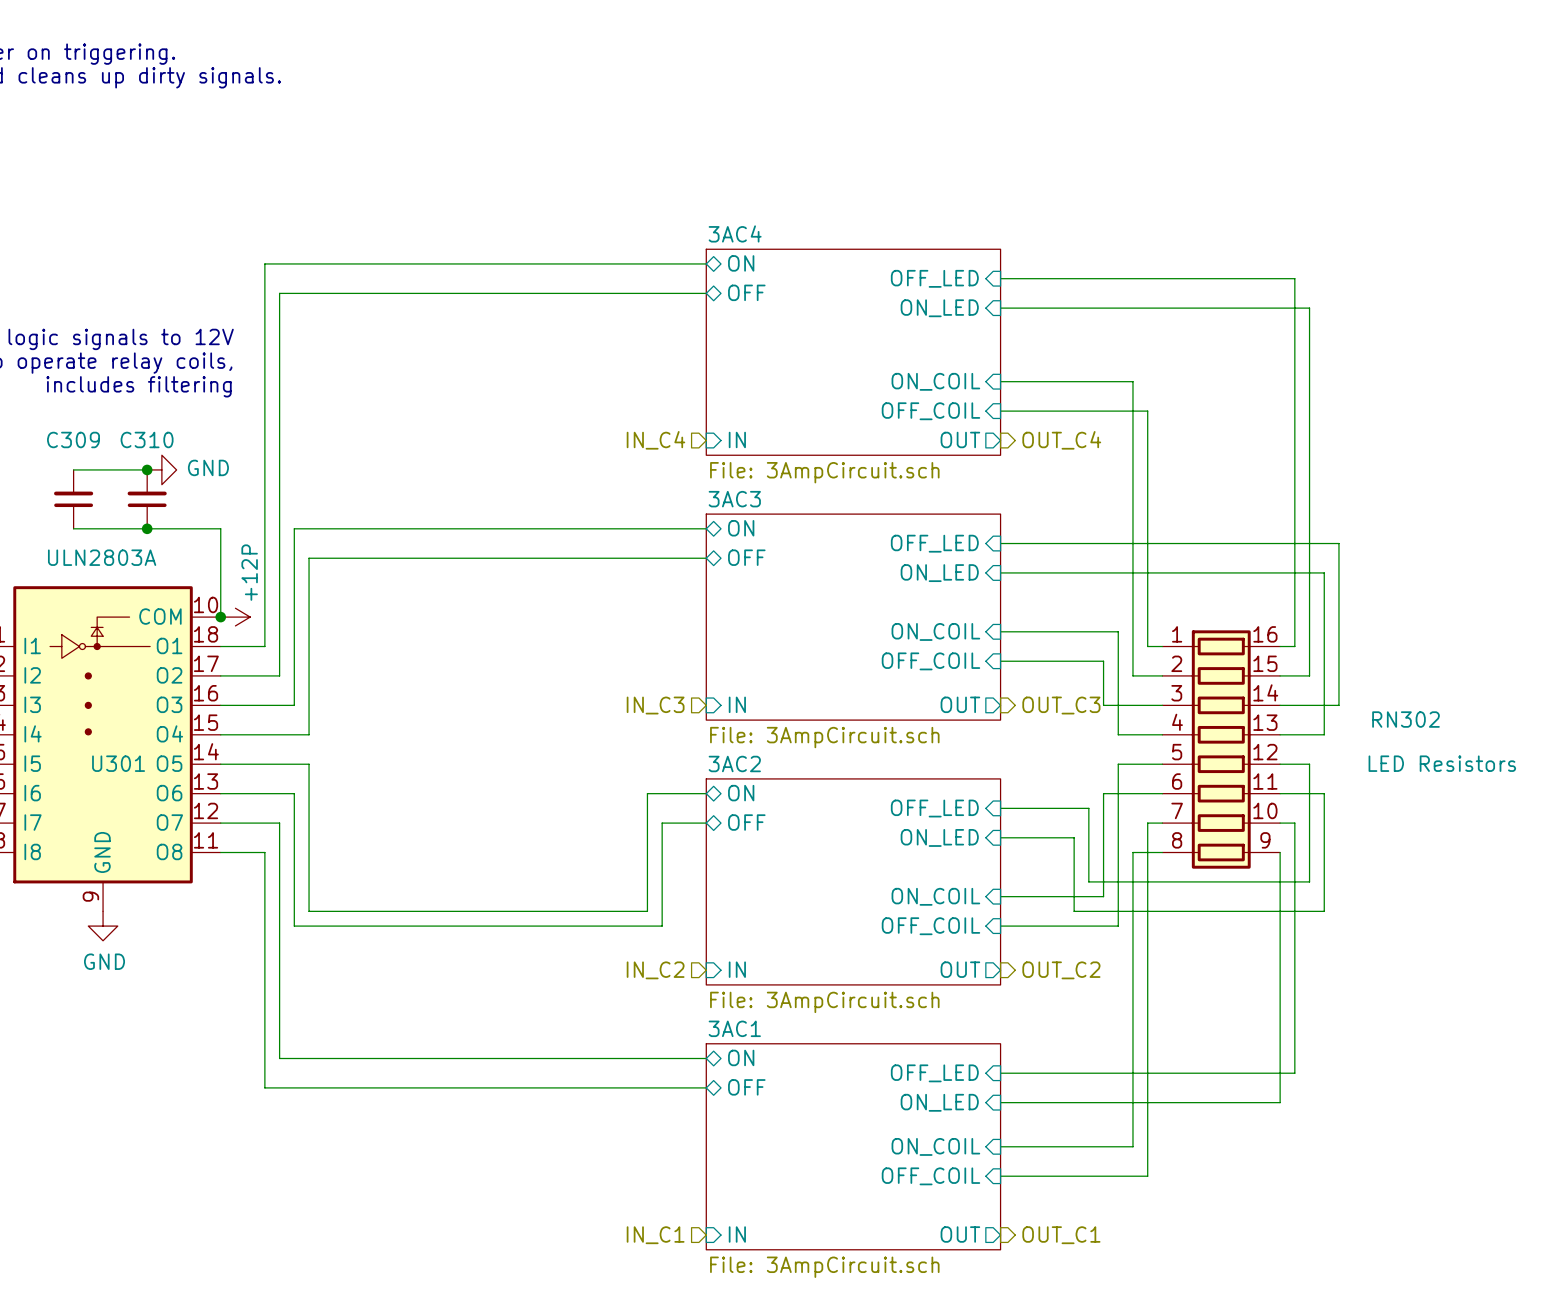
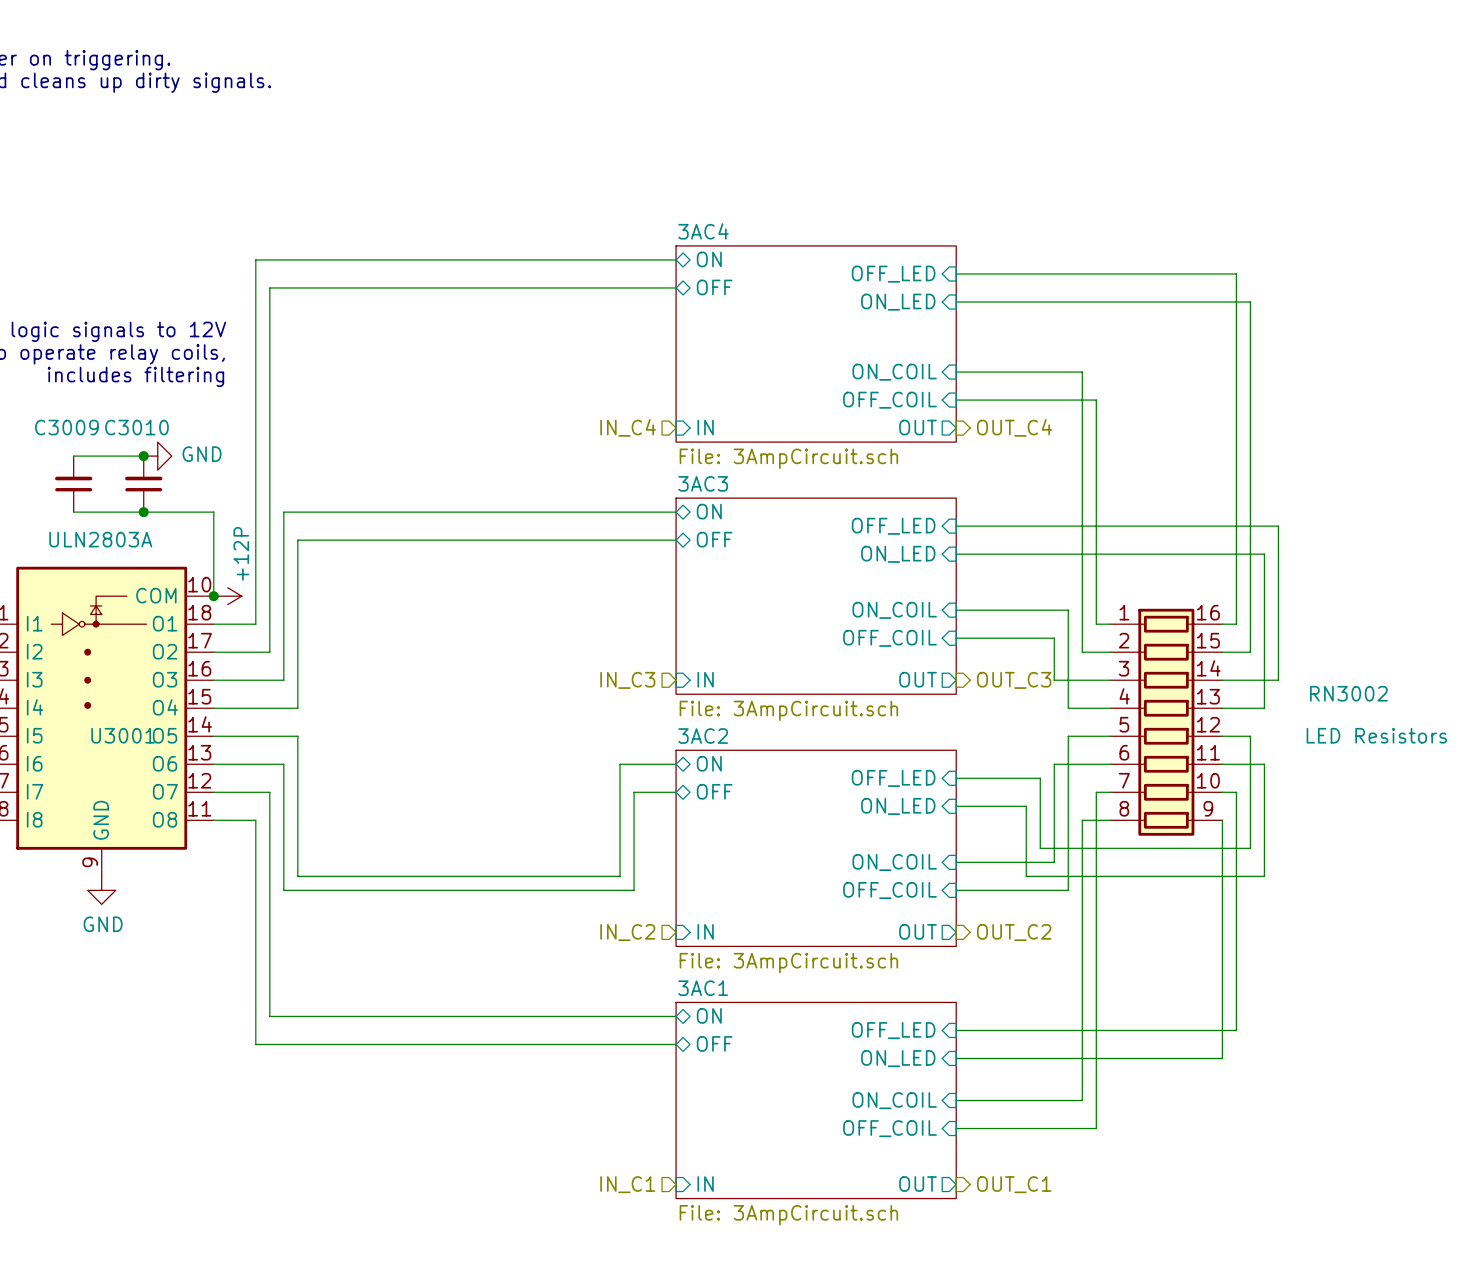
C309 name: C309 (73, 439) -> C3009 (66, 427)
C310 name: C310 (147, 439) -> C3010 (136, 427)
RN302 name: RN302 (1406, 719) -> RN3002 (1348, 693)
U301 name: U301 (118, 763) -> U3001 (123, 735)

